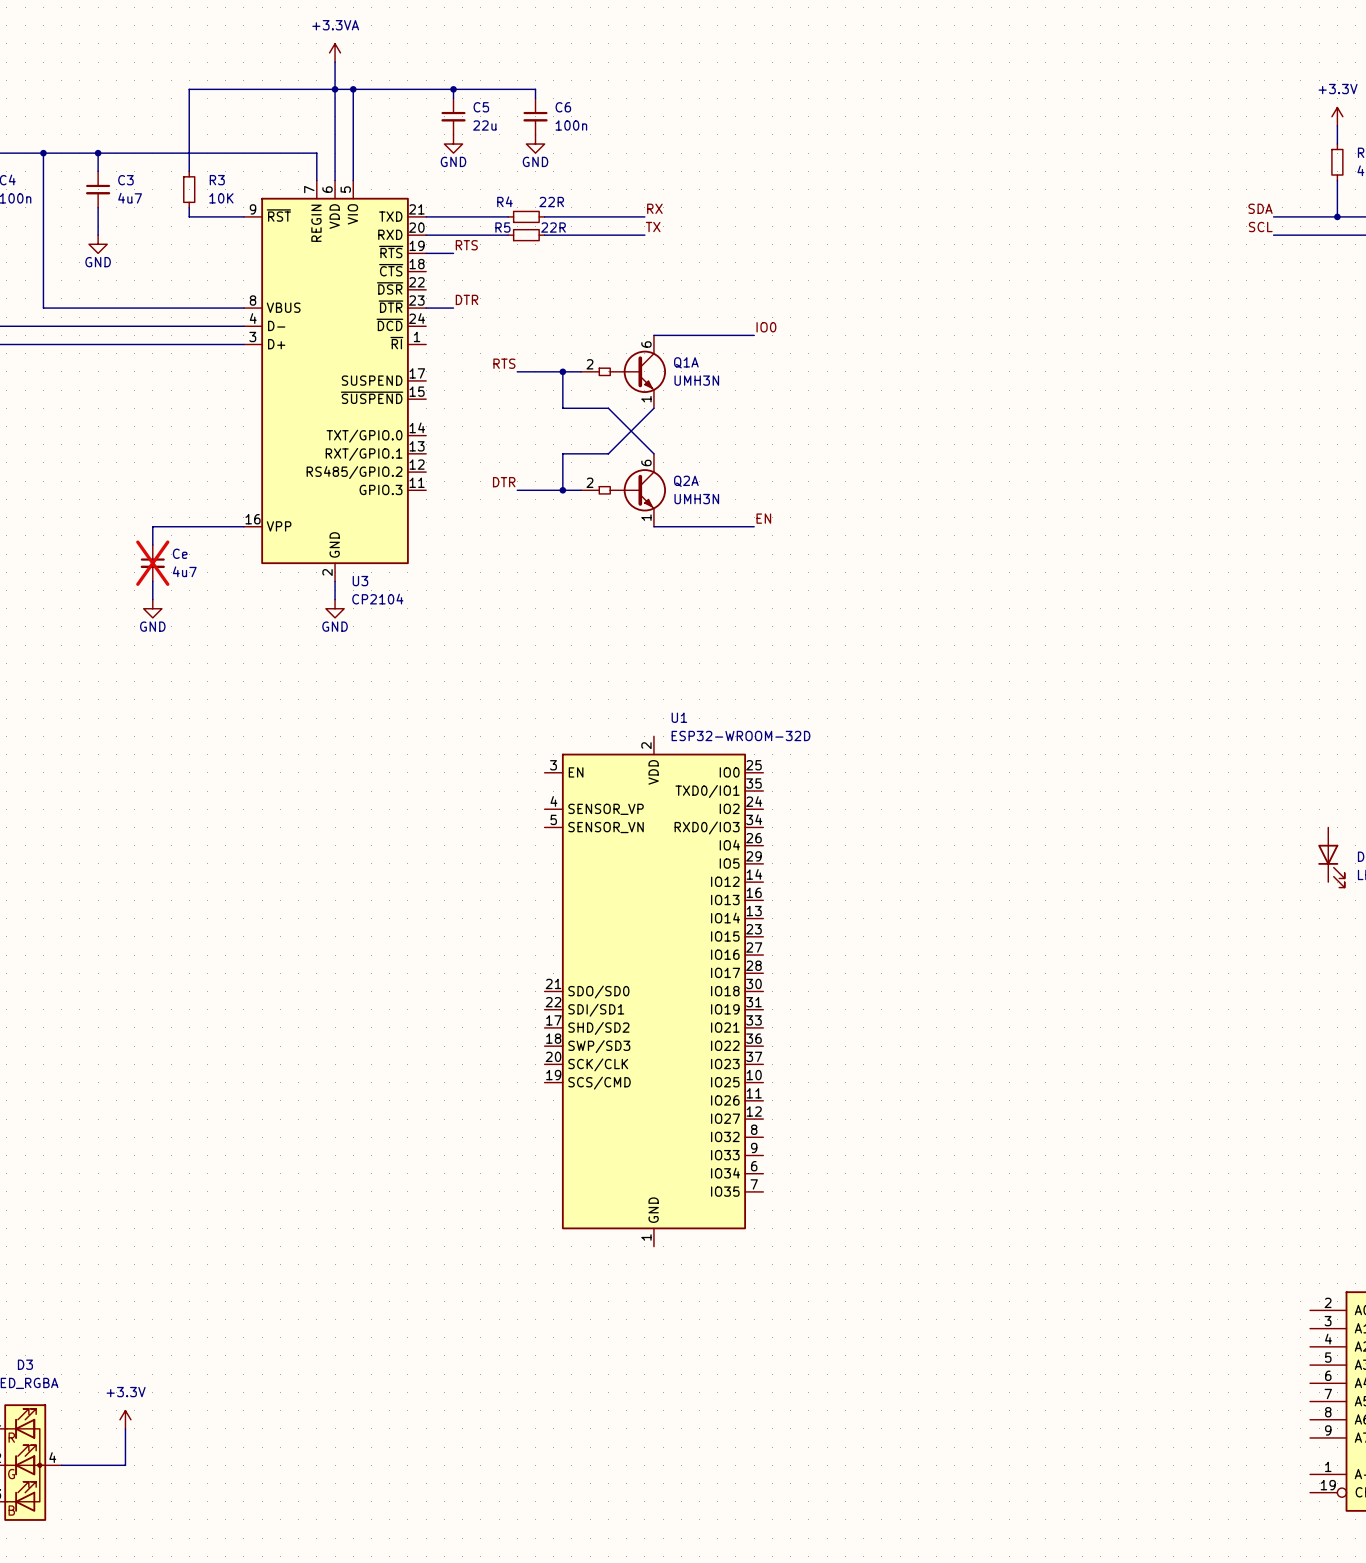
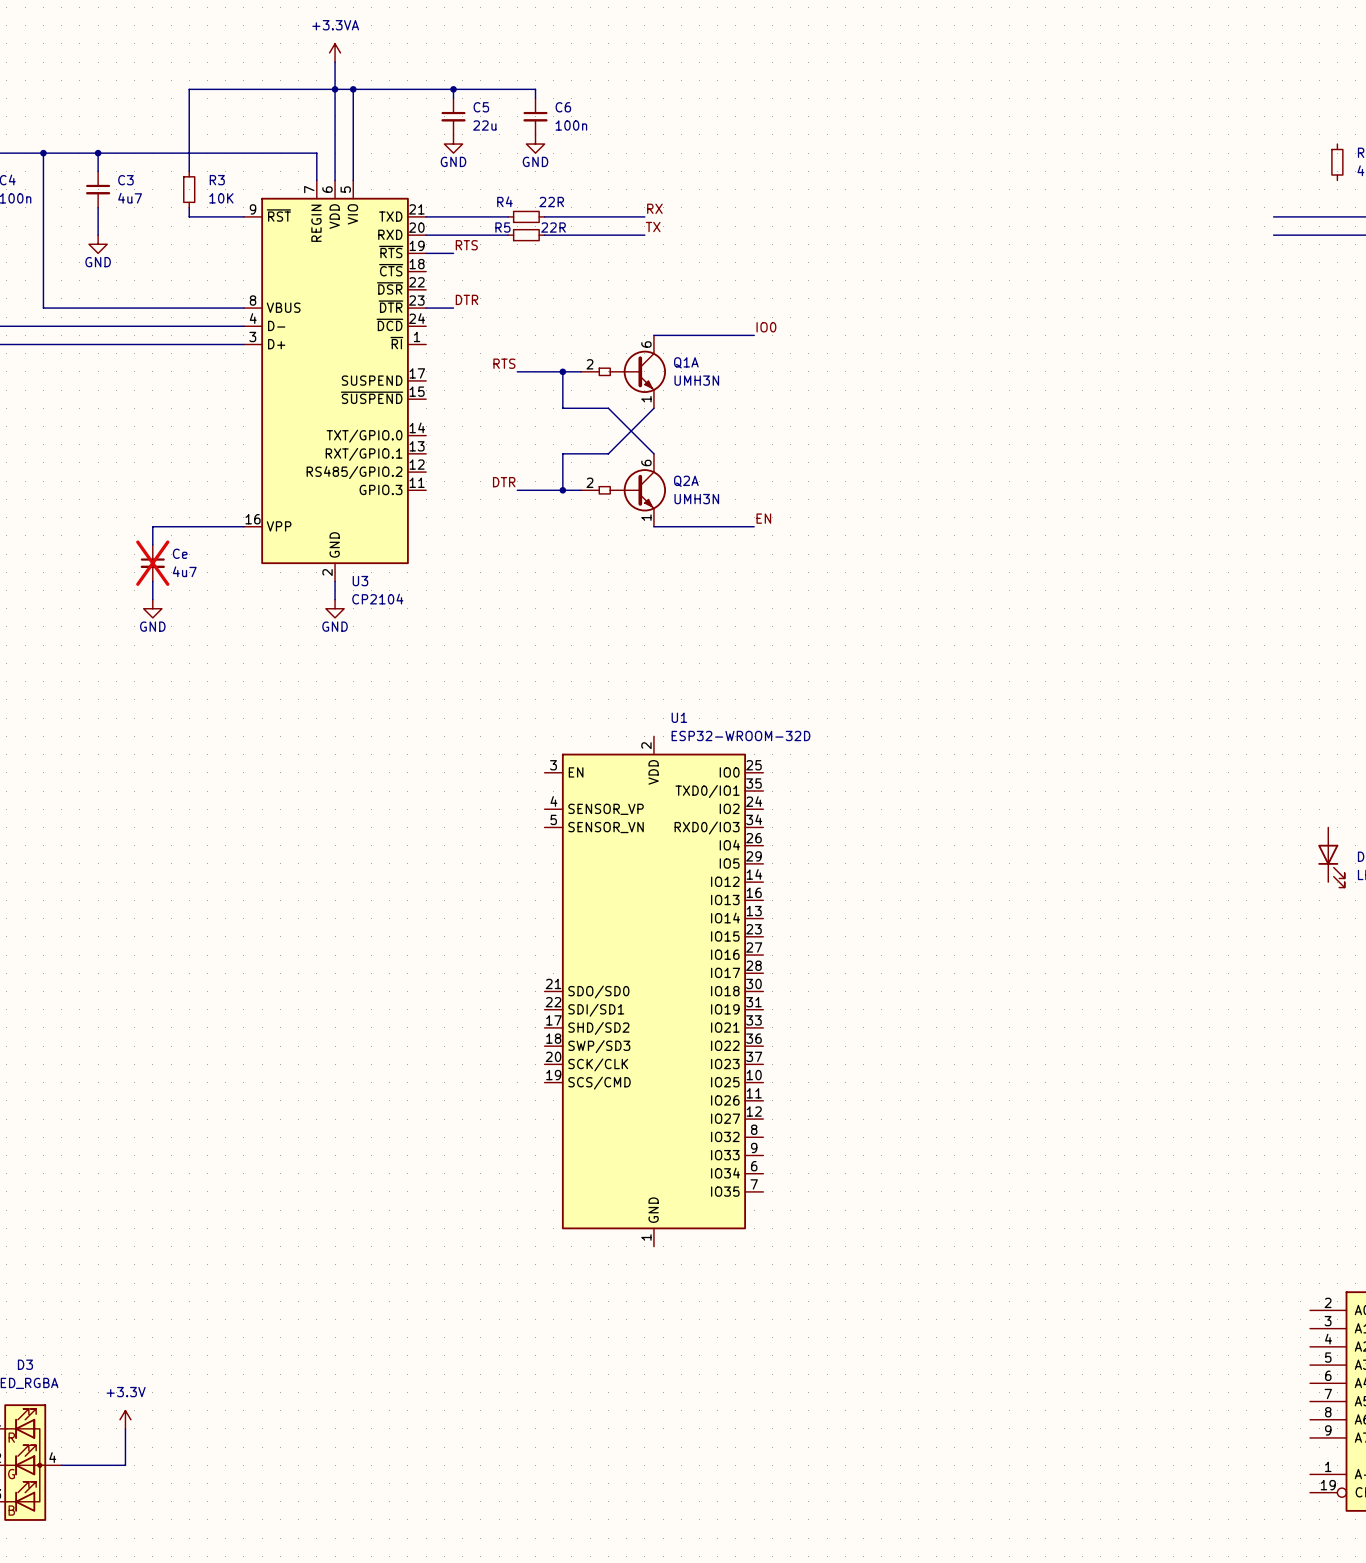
power symbol: +3.3V (1337, 116) -> none
wire: (1337, 125) (1337, 144) -> none
wire: (1337, 180) (1337, 216) -> none
label: SDA (1260, 208) -> none
junction: (1337, 216) -> none
label: SCL (1260, 227) -> none

